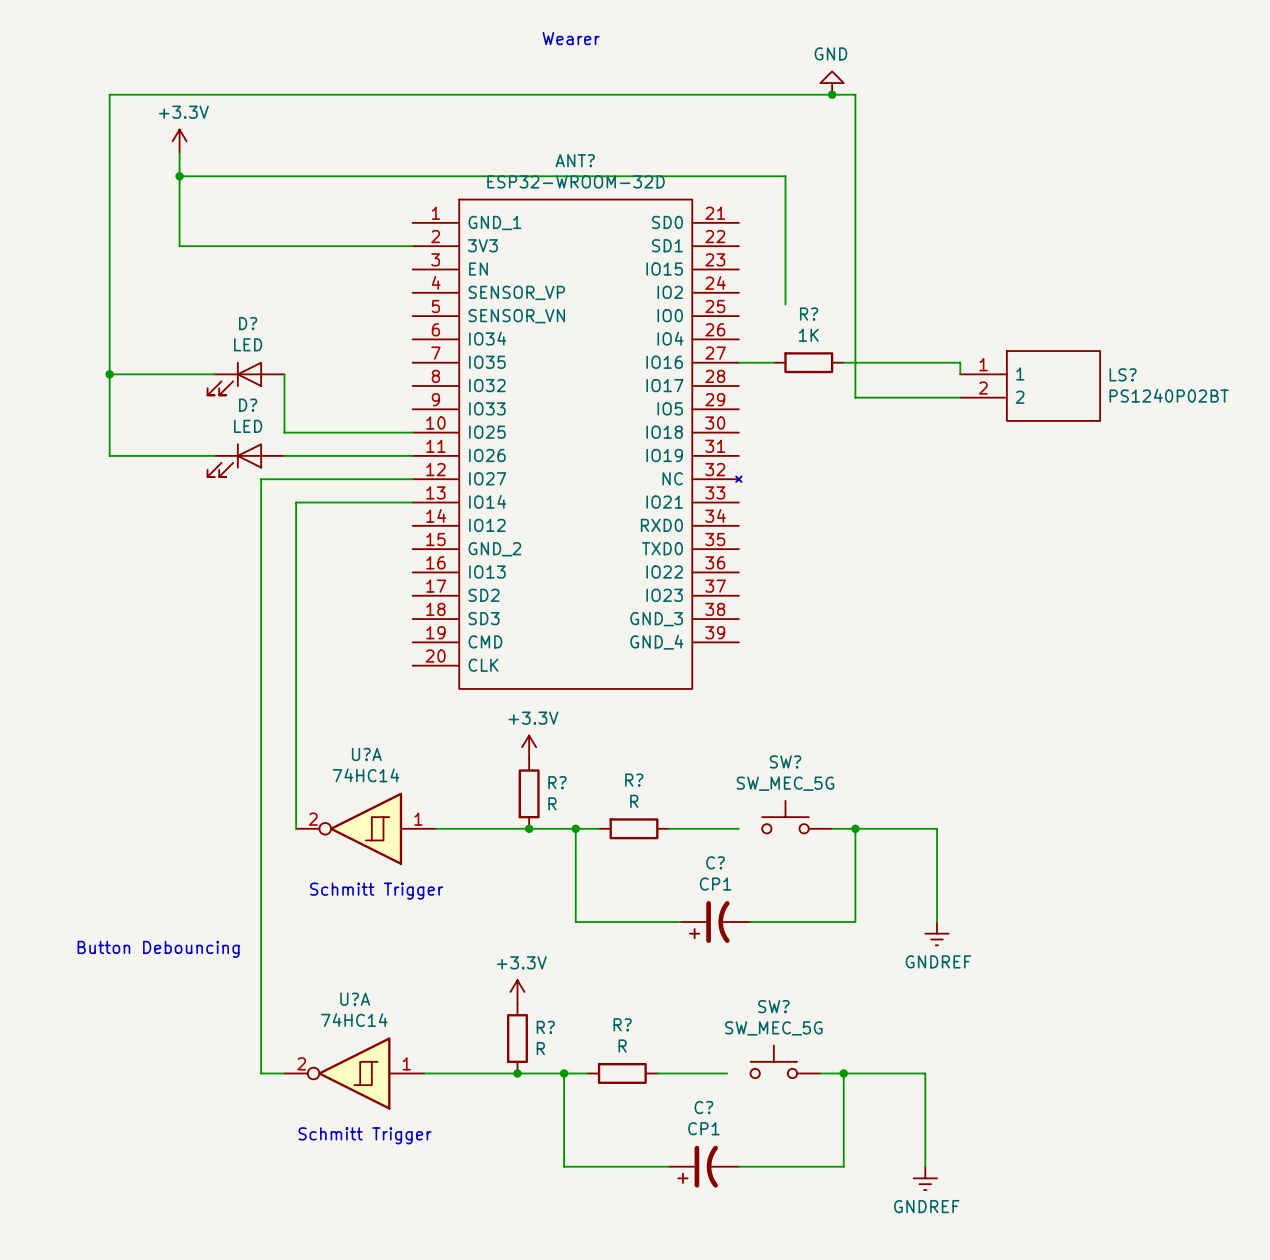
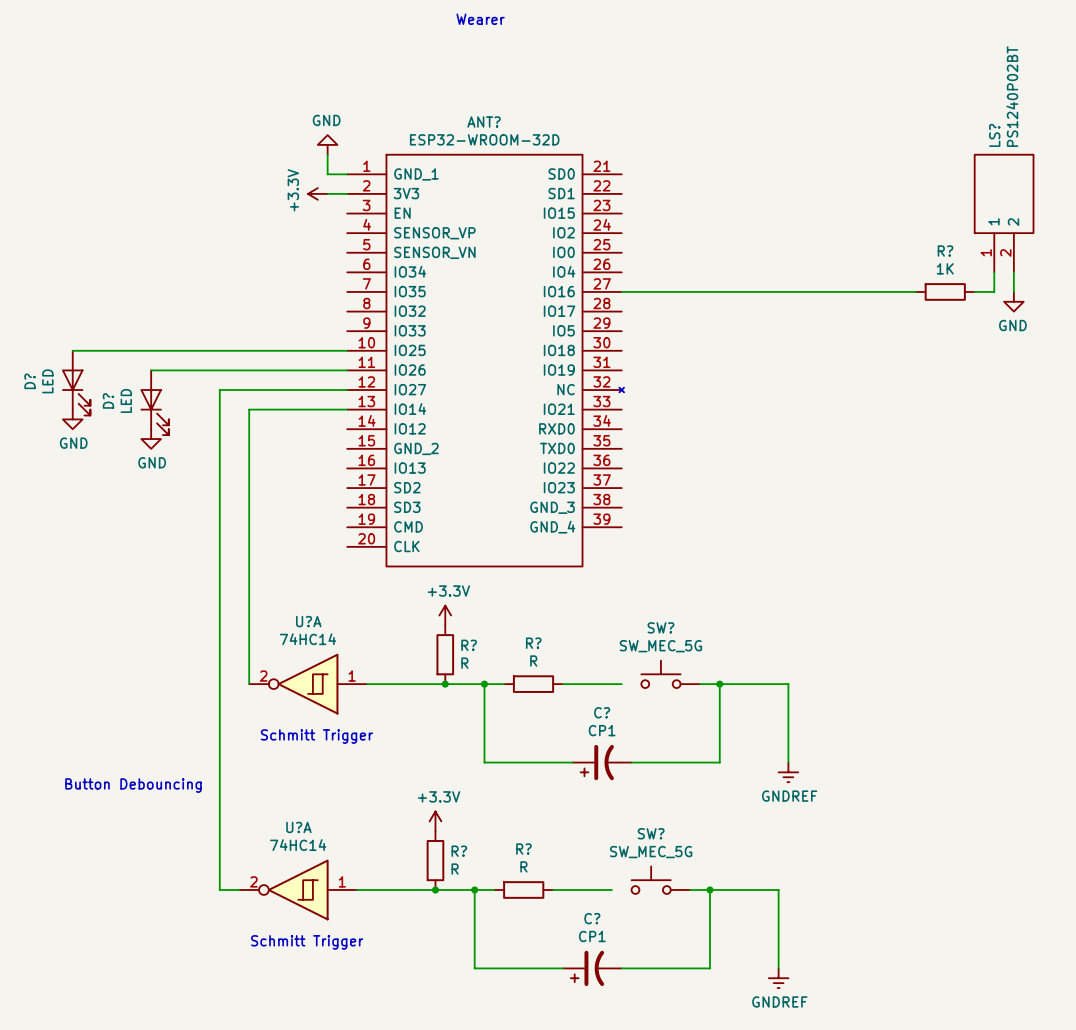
power symbol: GND (832, 83) -> none
junction: (832, 94) -> none
power symbol rotation: 0° (179, 141) -> 90° counterclockwise (317, 193)
power symbol position: +3.3V (179, 141) -> +3.3V (317, 193)
wire: (179, 152) (179, 246) (389, 246) -> none
wire: (179, 176) (785, 176) (785, 304) -> none
junction: (179, 176) -> none
power symbol: none -> GND (327, 144)
wire: none -> (327, 154) (327, 174) (347, 174)
wire: none -> (994, 272) (994, 291) (974, 291)
wire: none -> (1013, 272) (1013, 291)
wire: none -> (651, 291) (709, 291)
R?: 1K (808, 362) -> none
wire: (960, 362) (960, 374) -> (808, 291) (915, 291)
R?: none -> 1K (945, 291)
wire: (109, 374) (214, 374) -> none
junction: (109, 374) -> none
wire: (284, 374) (284, 432) -> (72, 350) (239, 350)
power symbol: none -> GND (1013, 301)
D?: LED (245, 378) -> none
LS? position: (1030, 386) -> (1004, 213)
LS? rotation: 0° (1053, 386) -> 90° counterclockwise (1004, 193)
wire: (960, 397) (855, 397) (855, 94) (109, 94) (109, 455) (179, 455) -> none
D?: LED (245, 460) -> none
D?: none -> LED (76, 383)
D?: none -> LED (154, 402)
power symbol: none -> GND (72, 419)
power symbol: none -> GND (151, 439)

